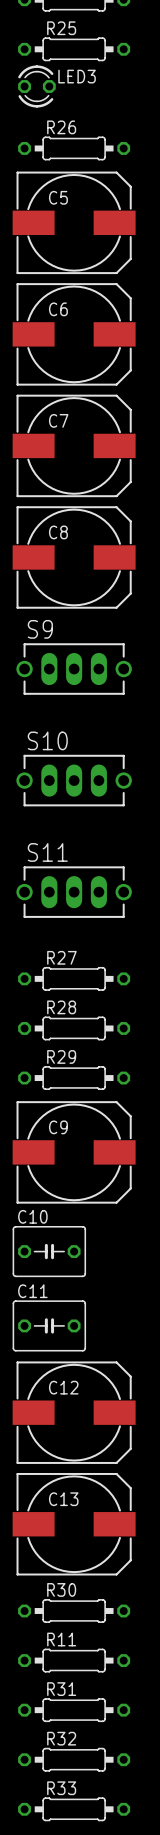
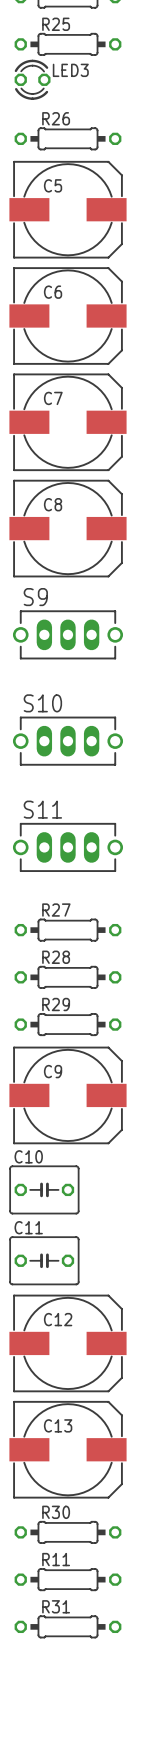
R32: (74, 1759) -> none
R33: (74, 1809) -> none

